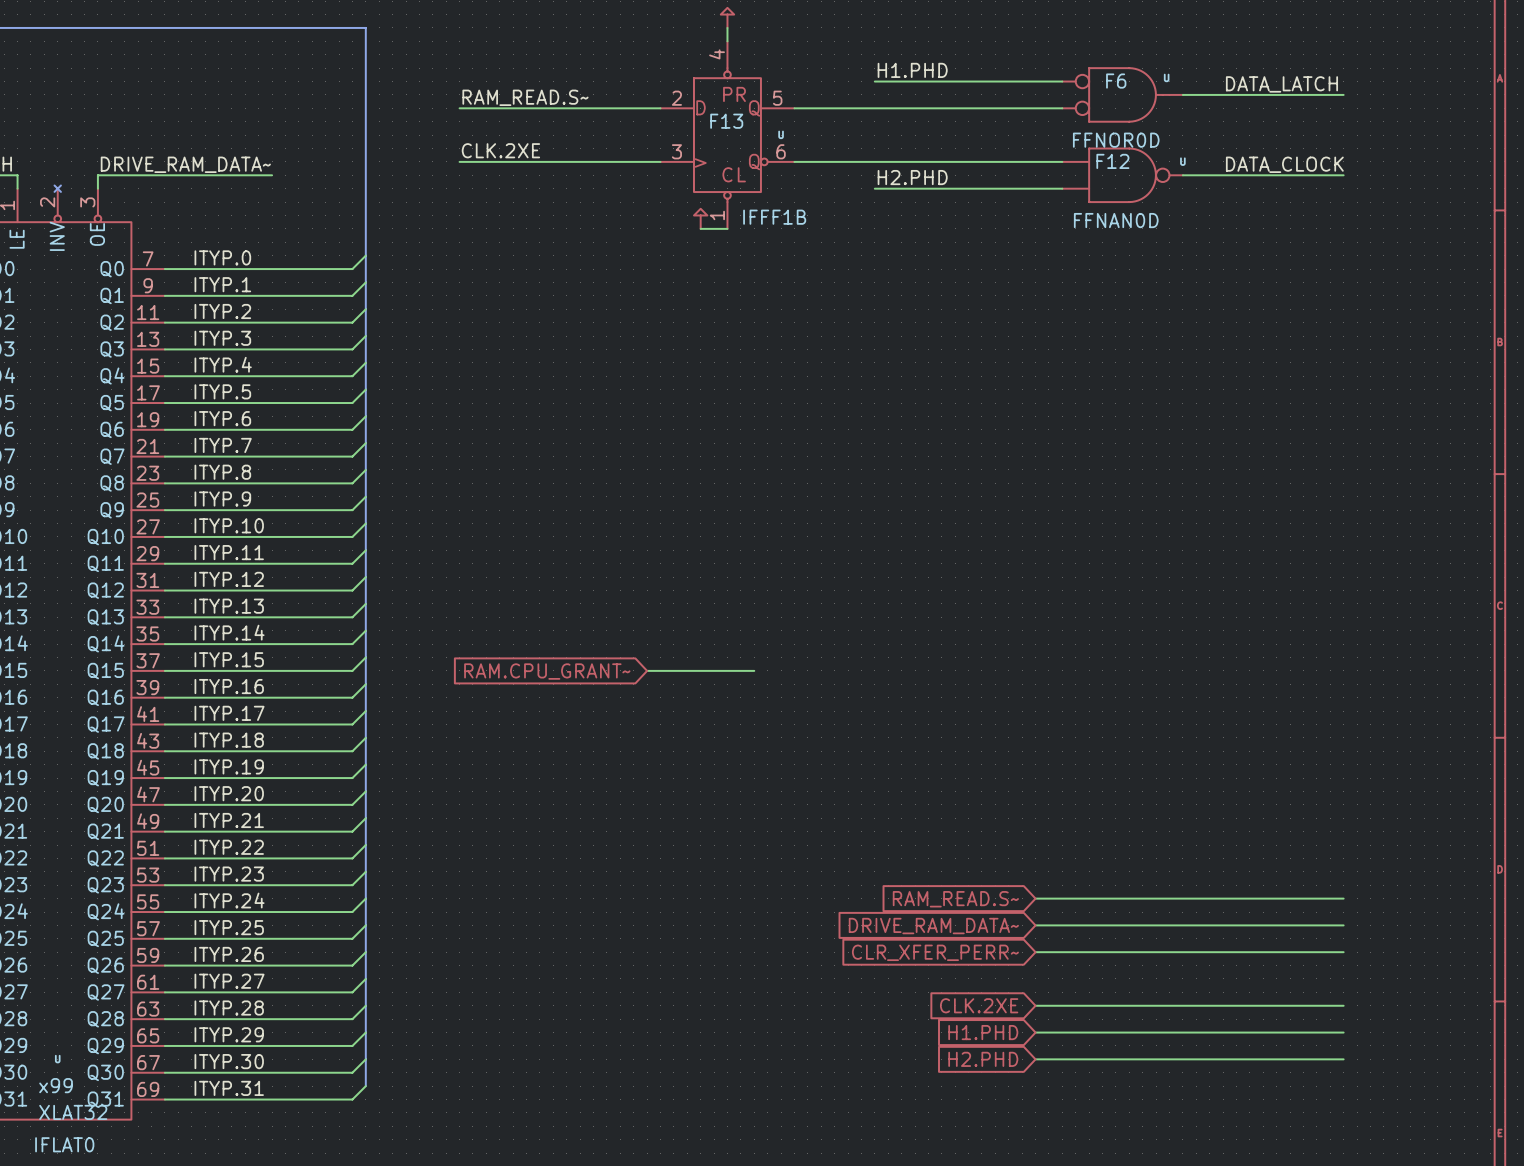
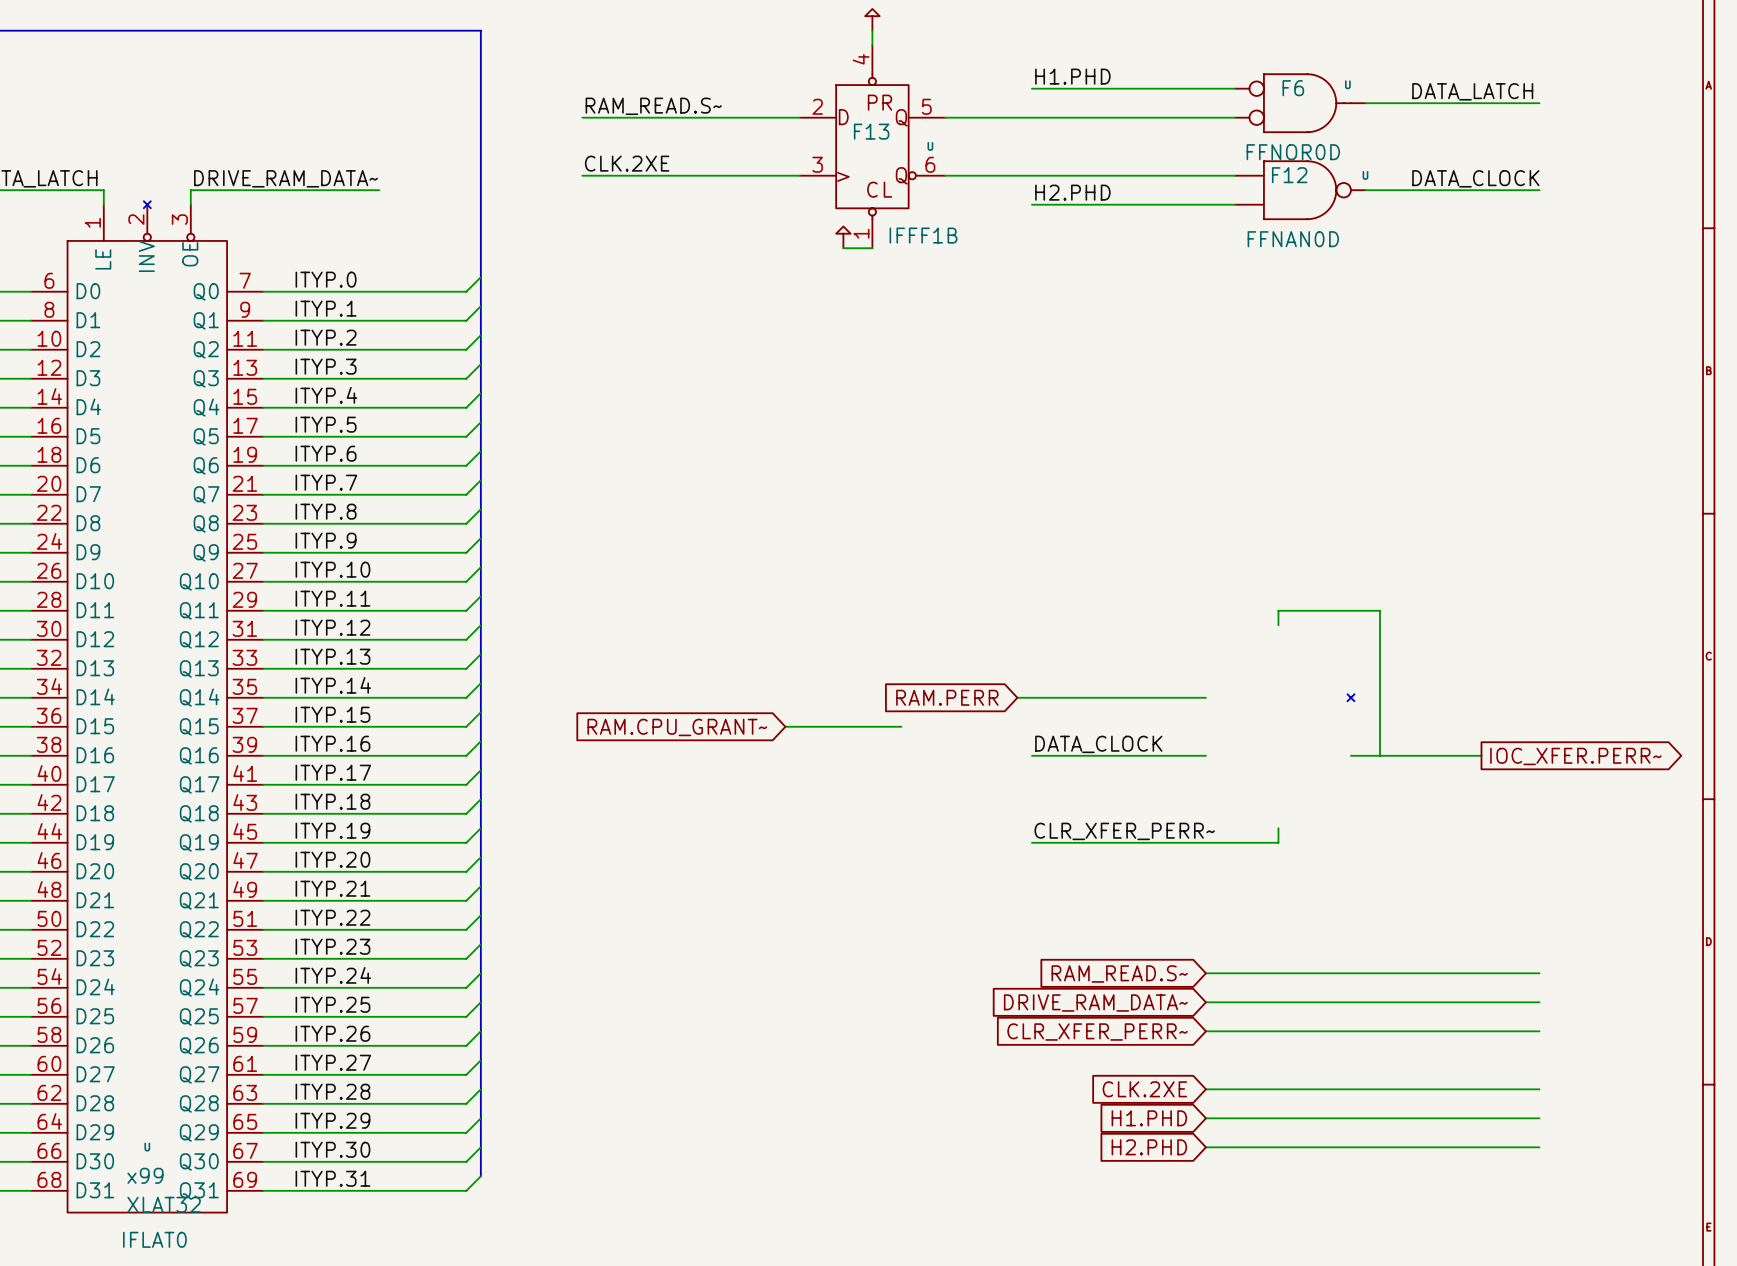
wire: none -> (1278, 625) (1278, 610) (1379, 610) (1379, 755)
global label: none -> RAM.PERR (947, 697)
wire: none -> (1017, 697) (1205, 697)
no-connect mark: none -> (1350, 697)
label: none -> DATA_CLOCK (1098, 744)
wire: none -> (1031, 755) (1205, 755)
wire: none -> (1350, 755) (1481, 755)
global label: none -> IOC_XFER.PERR~ (1575, 756)
wire: none -> (1278, 828) (1278, 842) (1031, 842)
label: none -> CLR_XFER_PERR~ (1124, 831)

